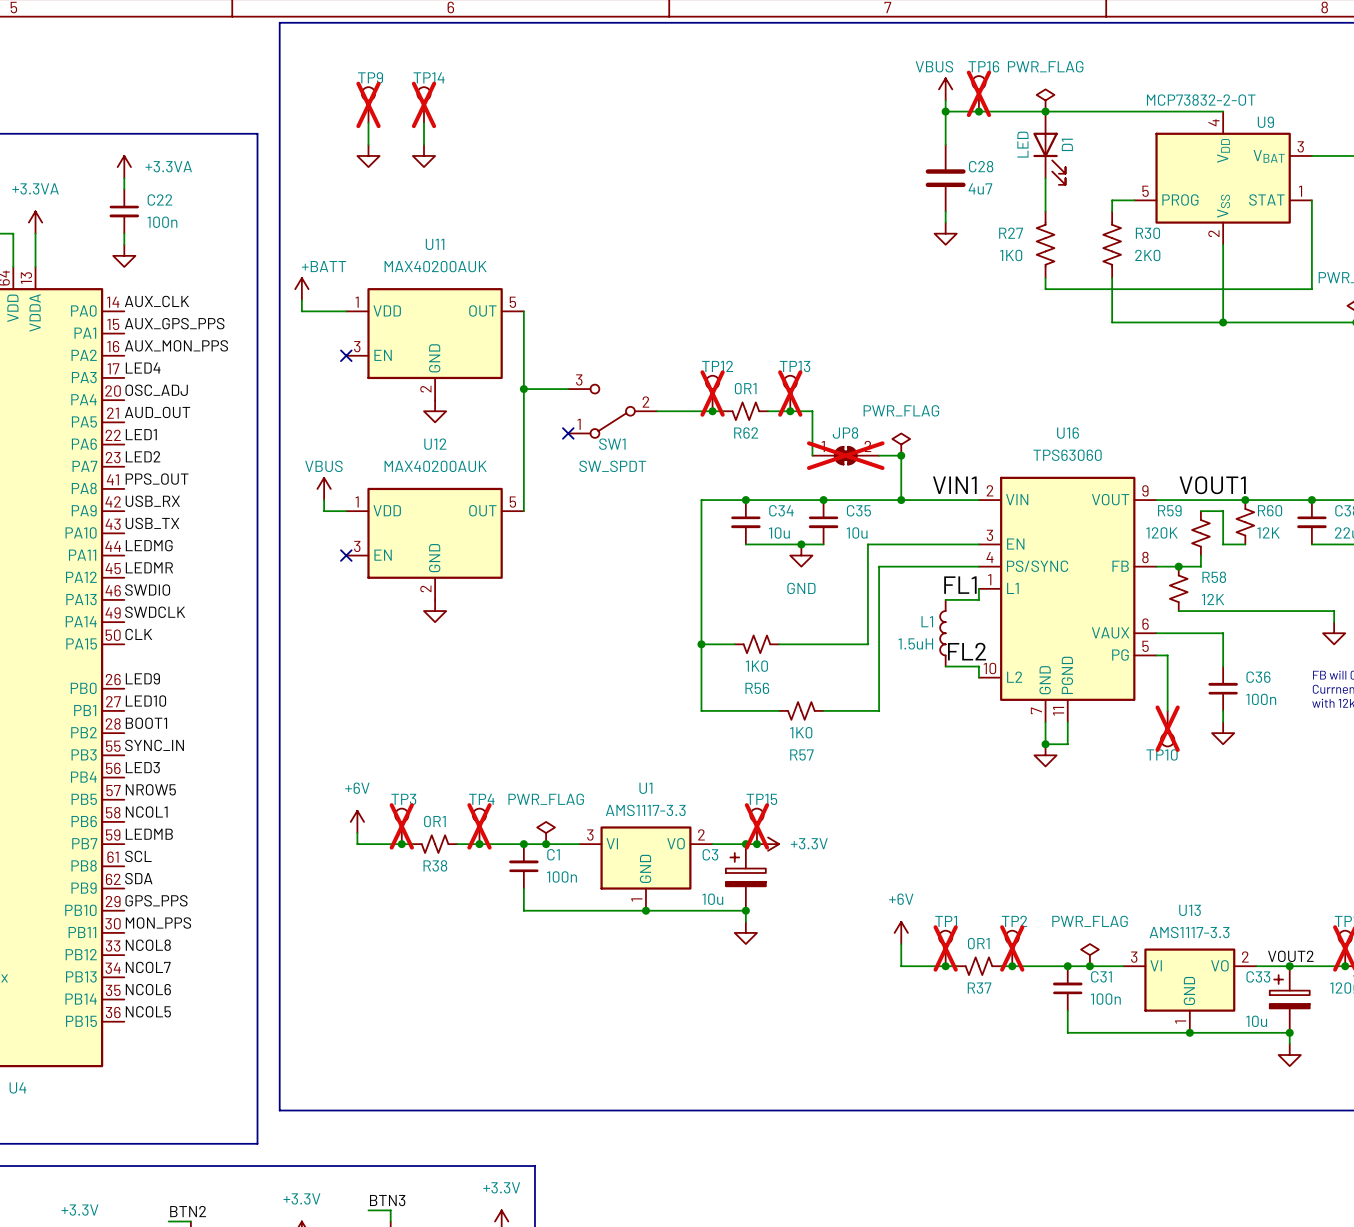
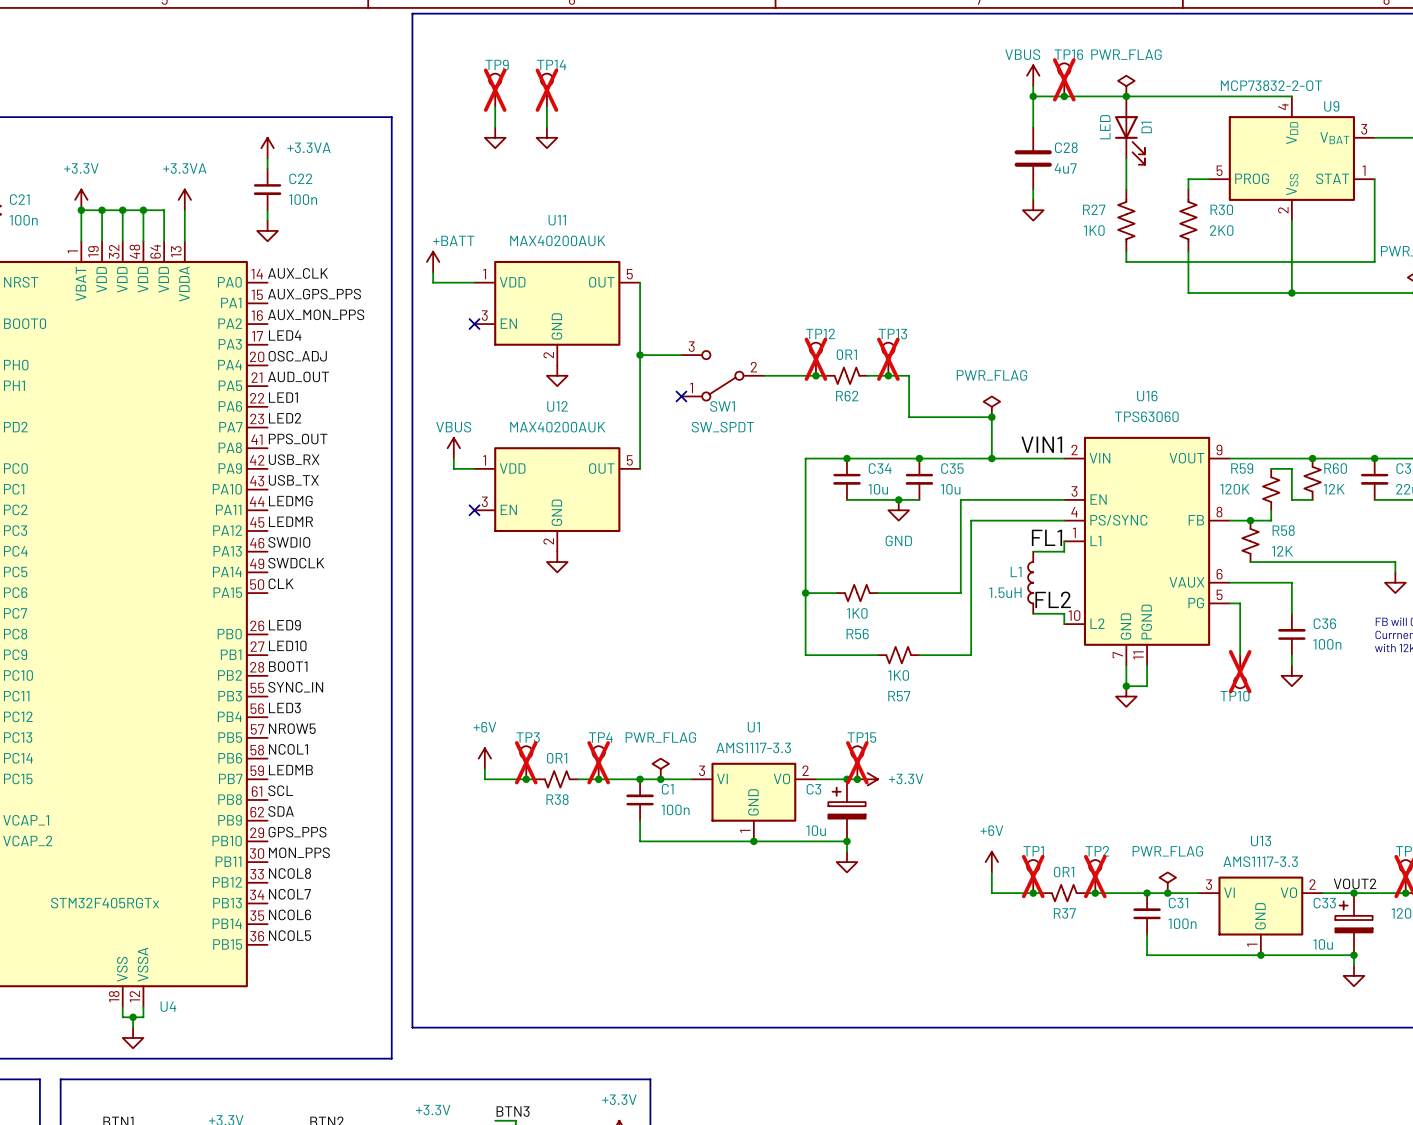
JP8: (845, 455) -> none
label: VOUT1 (1212, 485) -> none

